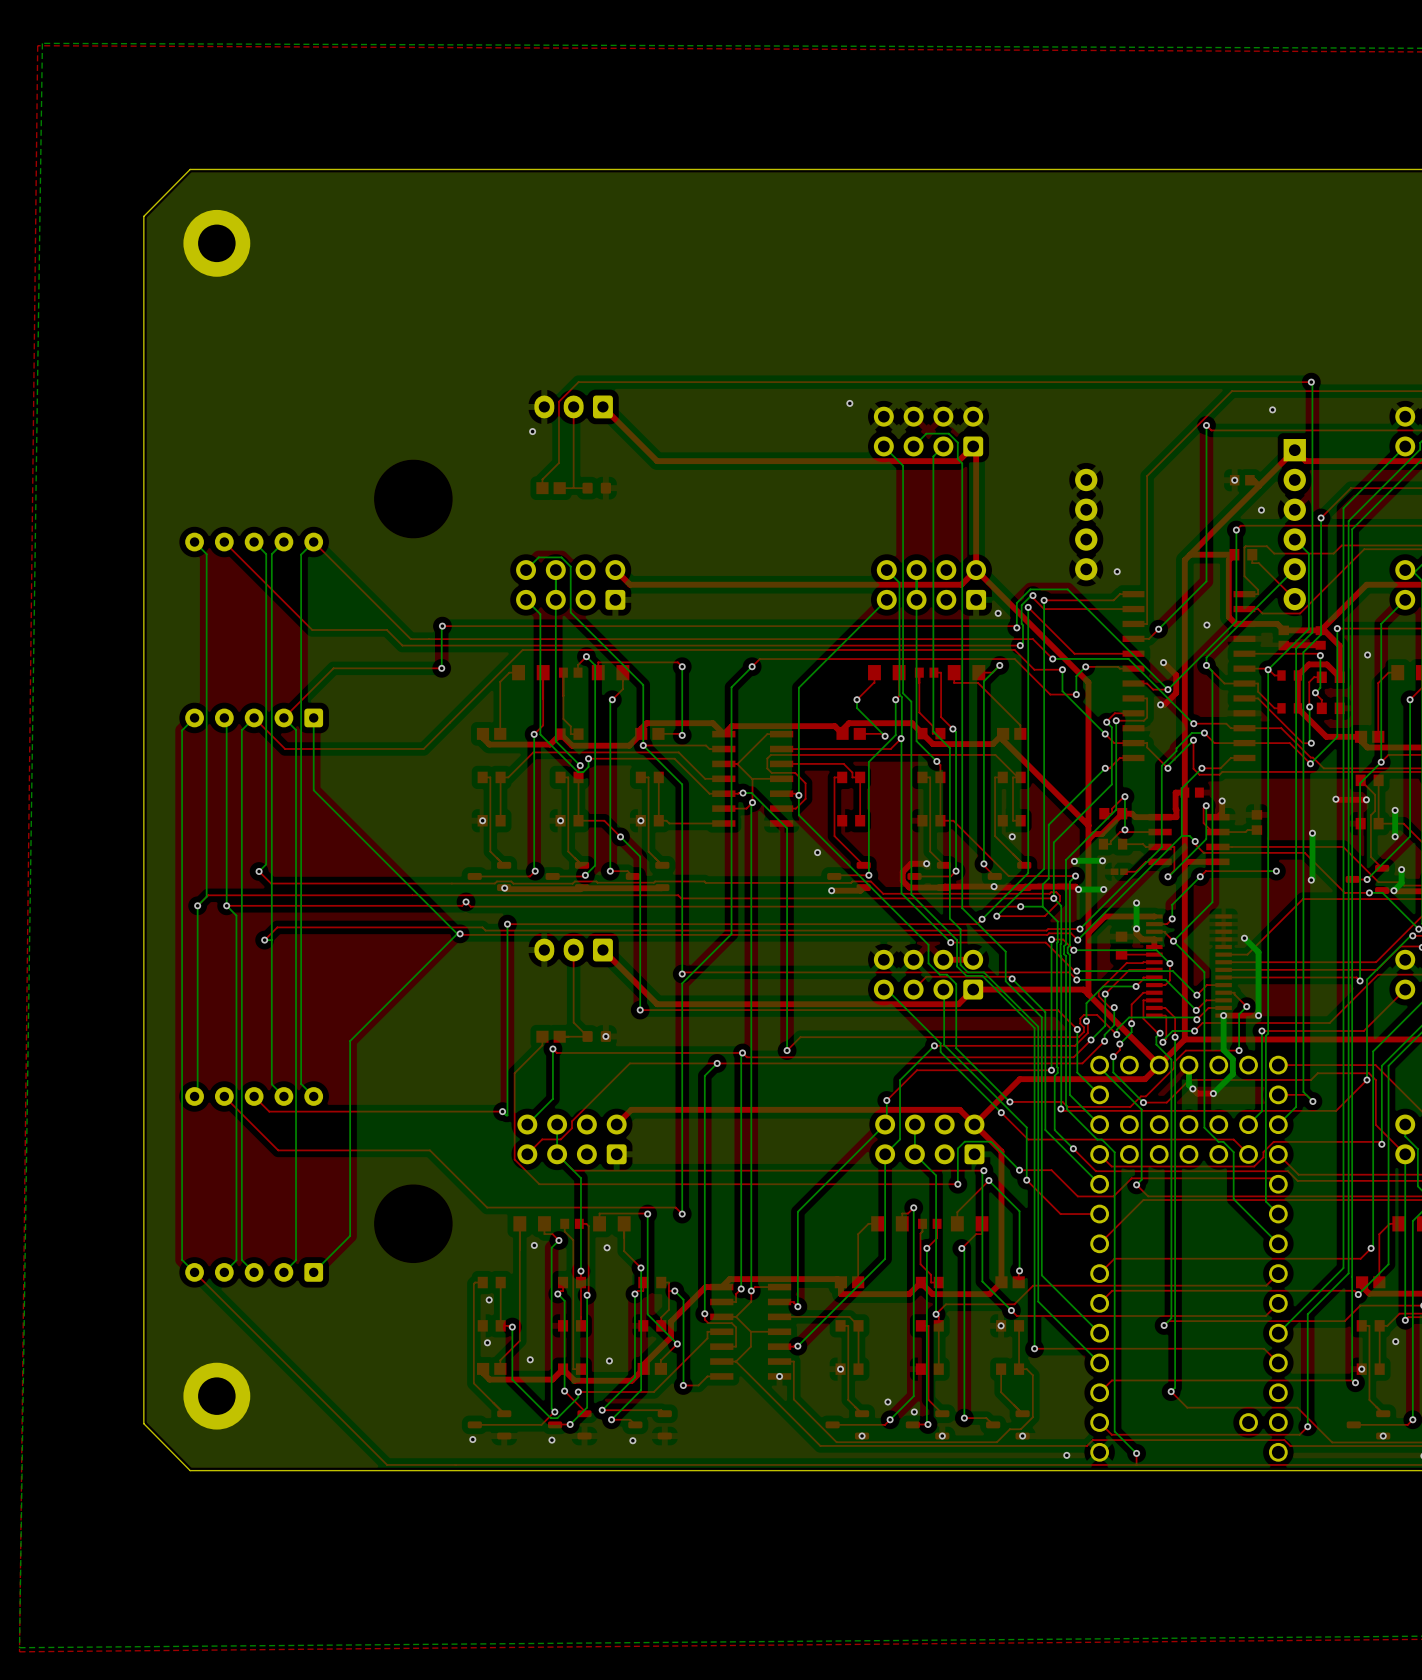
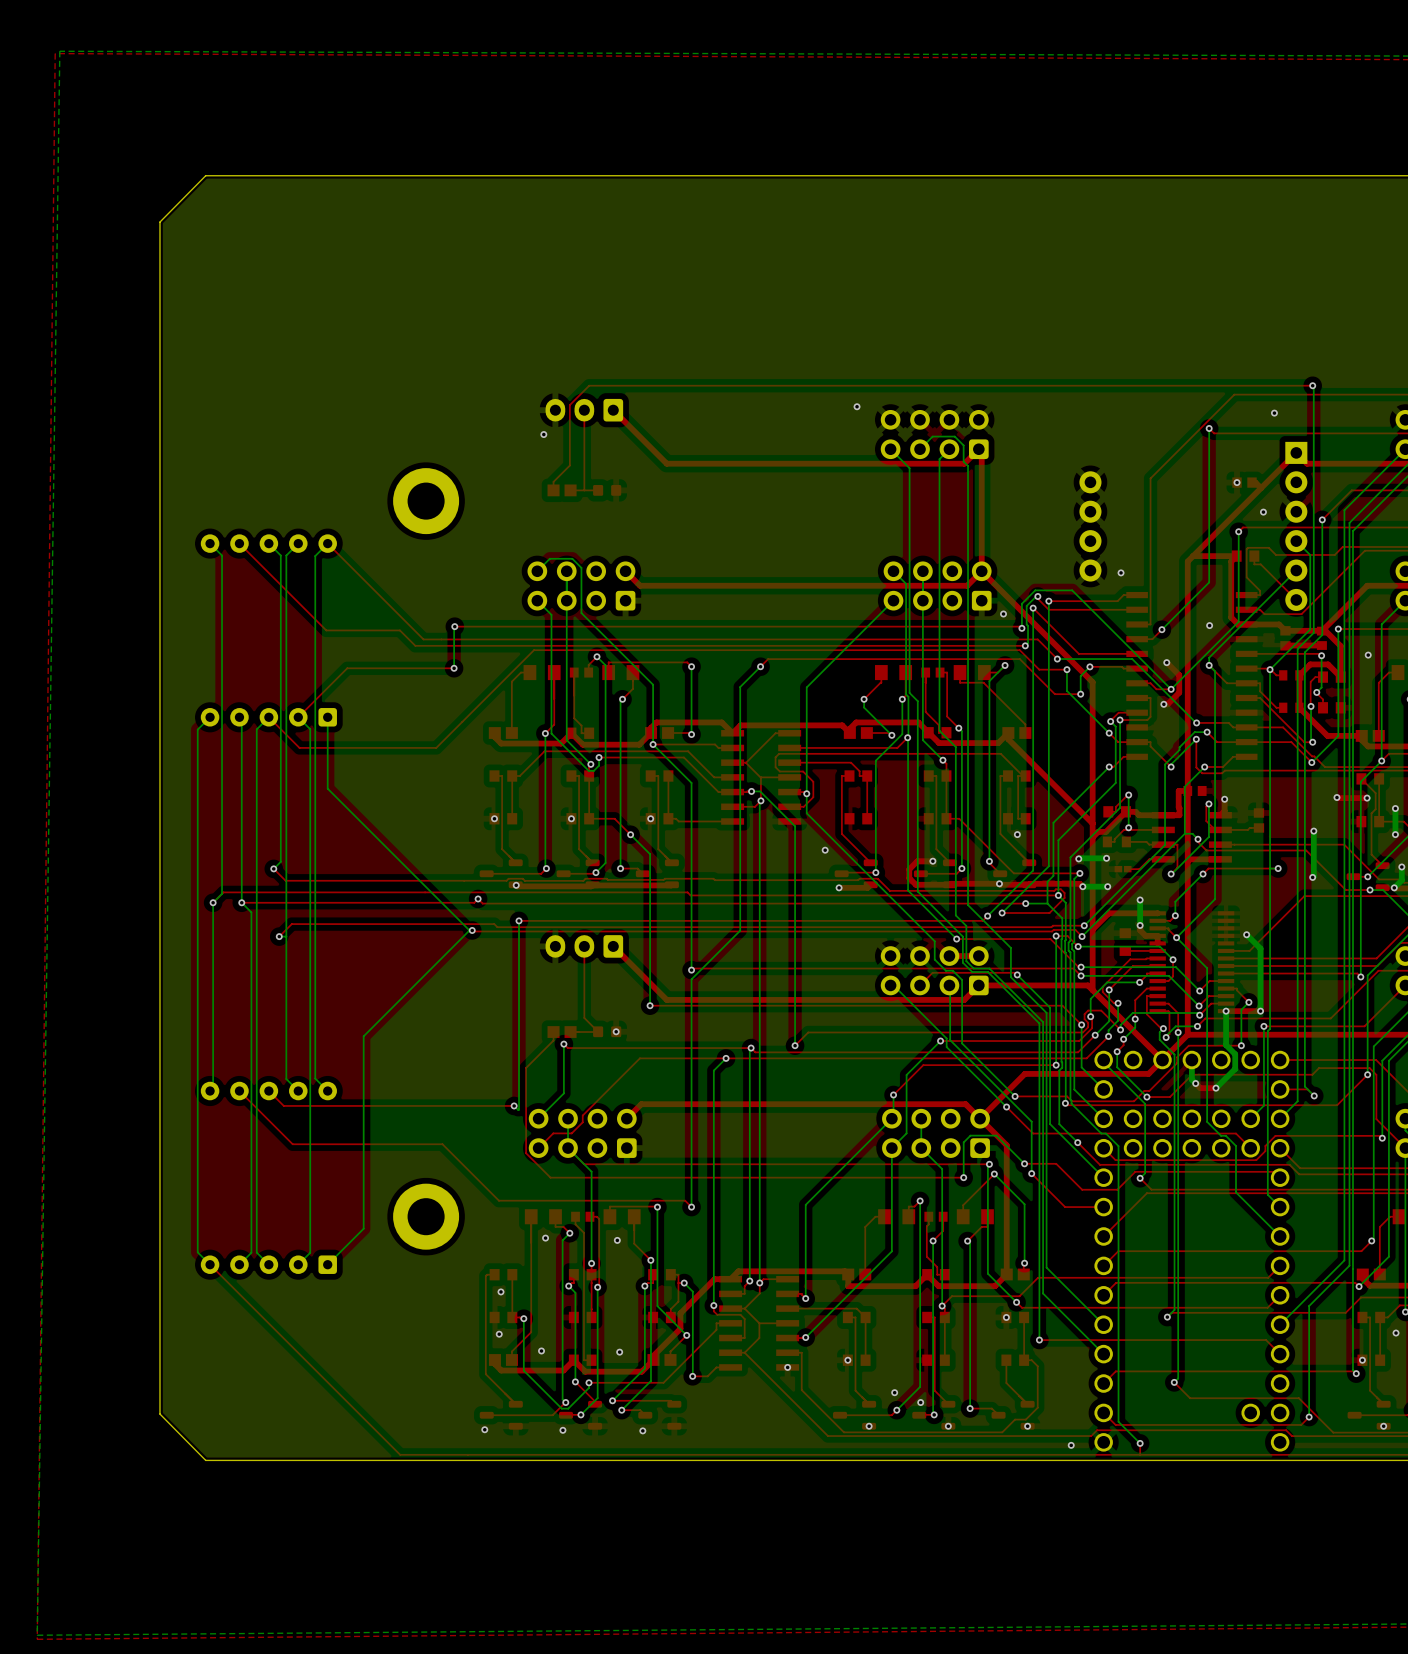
part: (216, 243) -> none
part: none -> (426, 501)
part position: (216, 1396) -> (426, 1216)

